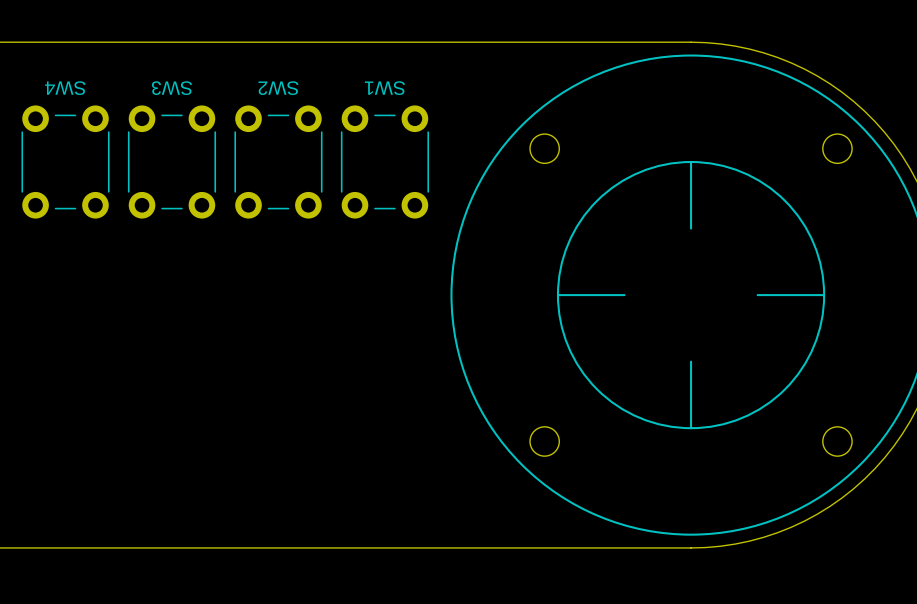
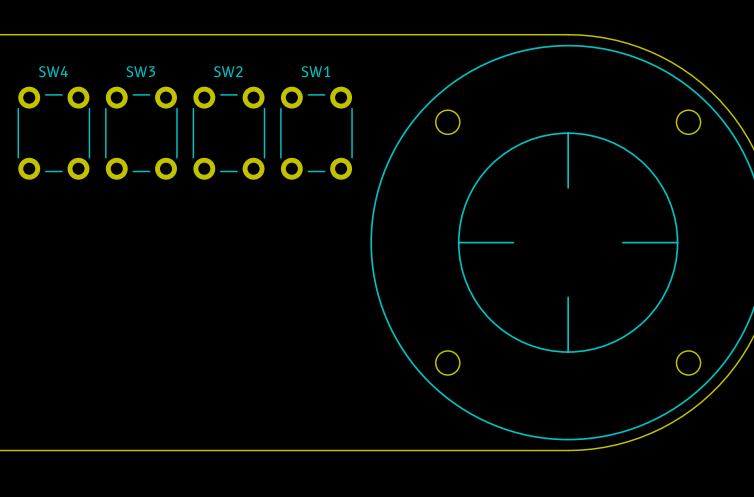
SW4 name rotation: 0° (65, 88) -> 180° (53, 71)
SW3 name rotation: 0° (171, 88) -> 180° (140, 71)
SW2 name rotation: 0° (278, 88) -> 180° (228, 71)
SW1 name rotation: 0° (384, 88) -> 180° (315, 71)

